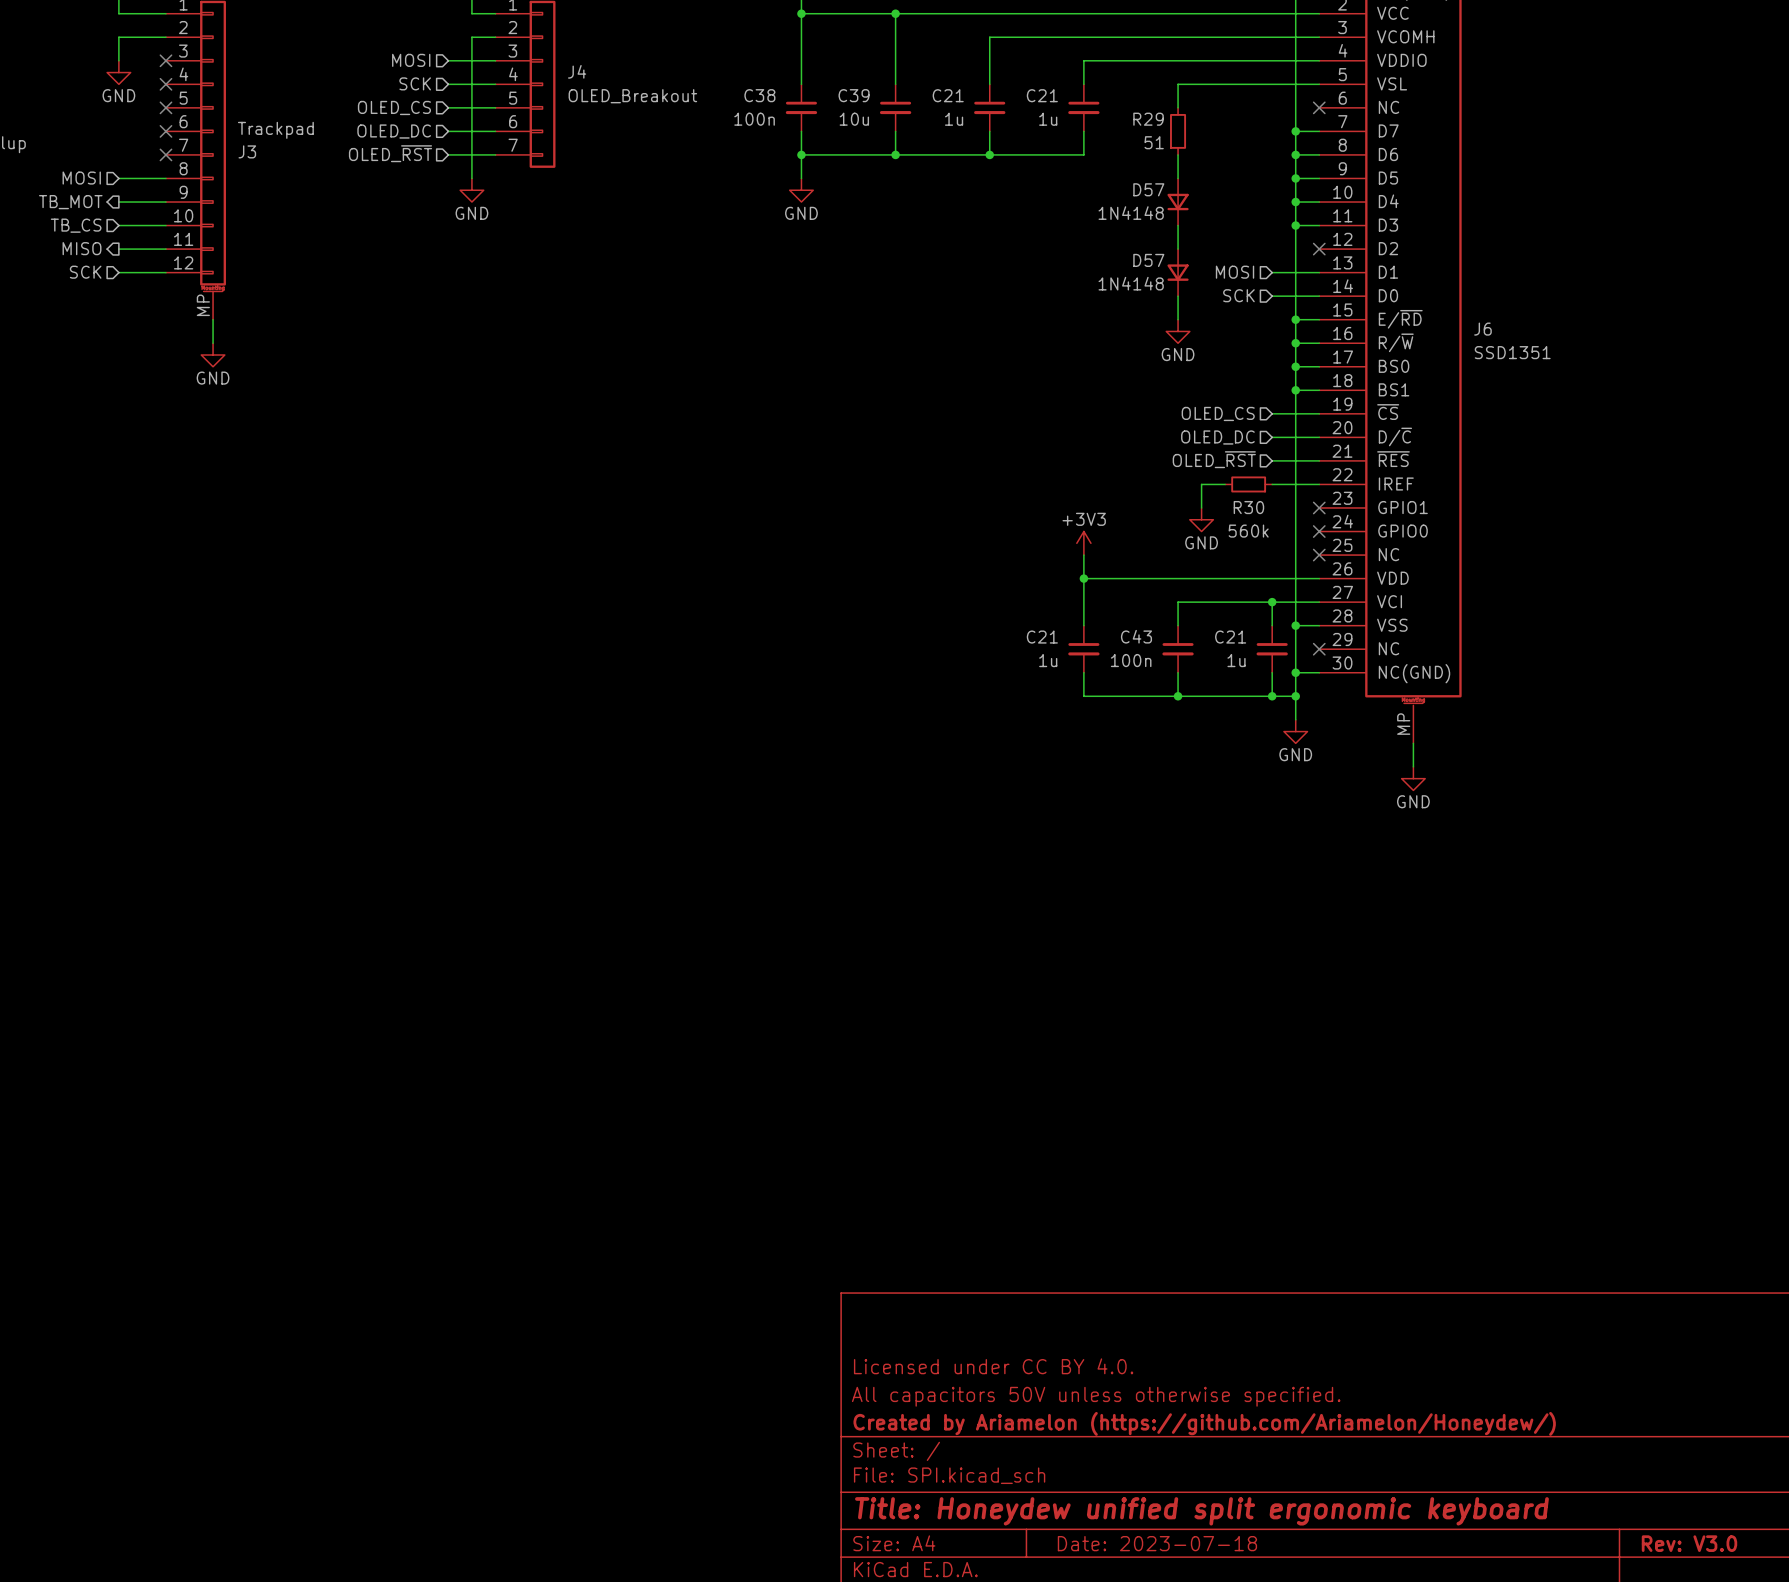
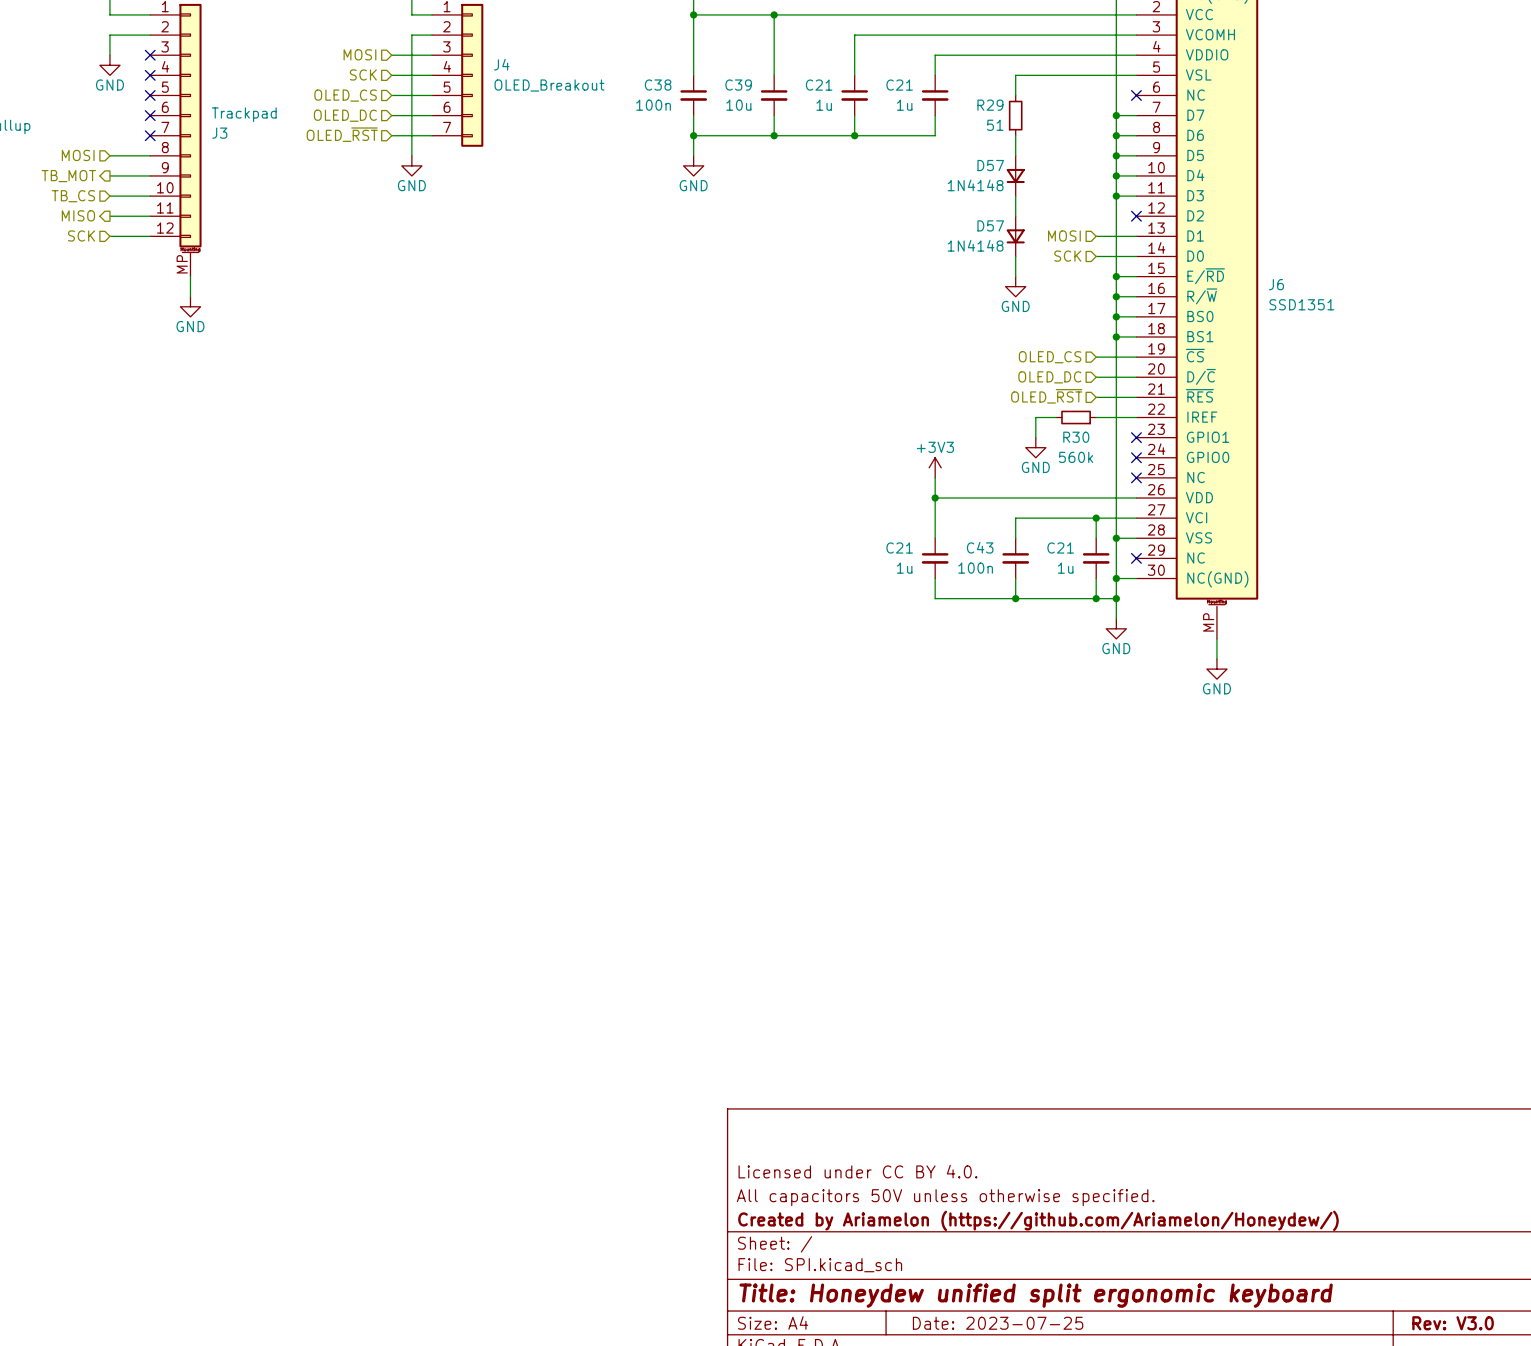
title block: Date: 2023-07-18 (1157, 1543) -> Date: 2023-07-25 (998, 1323)

